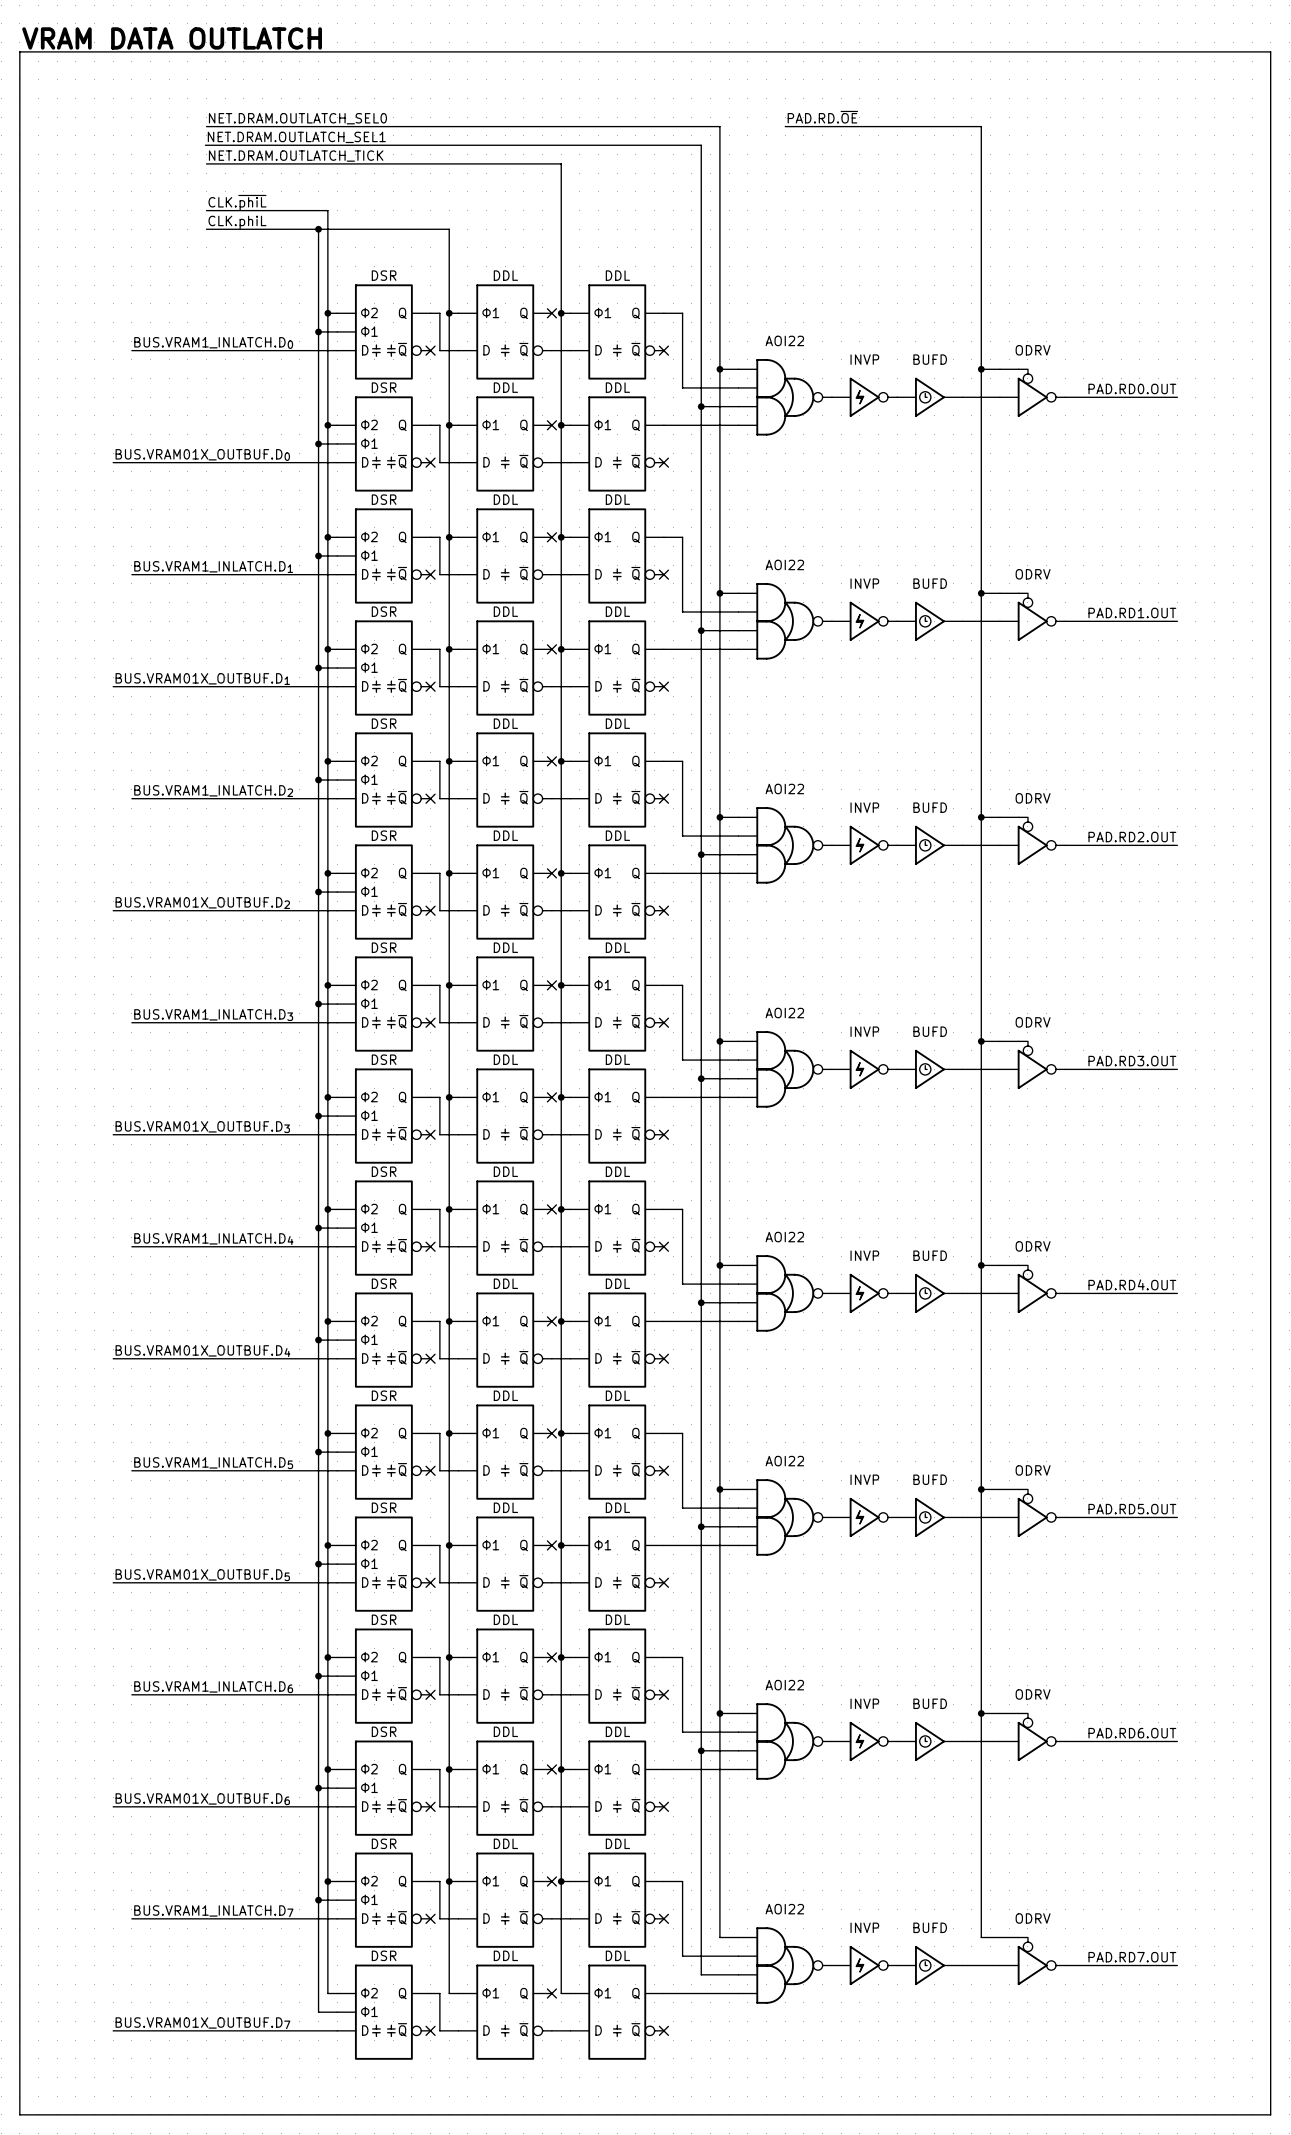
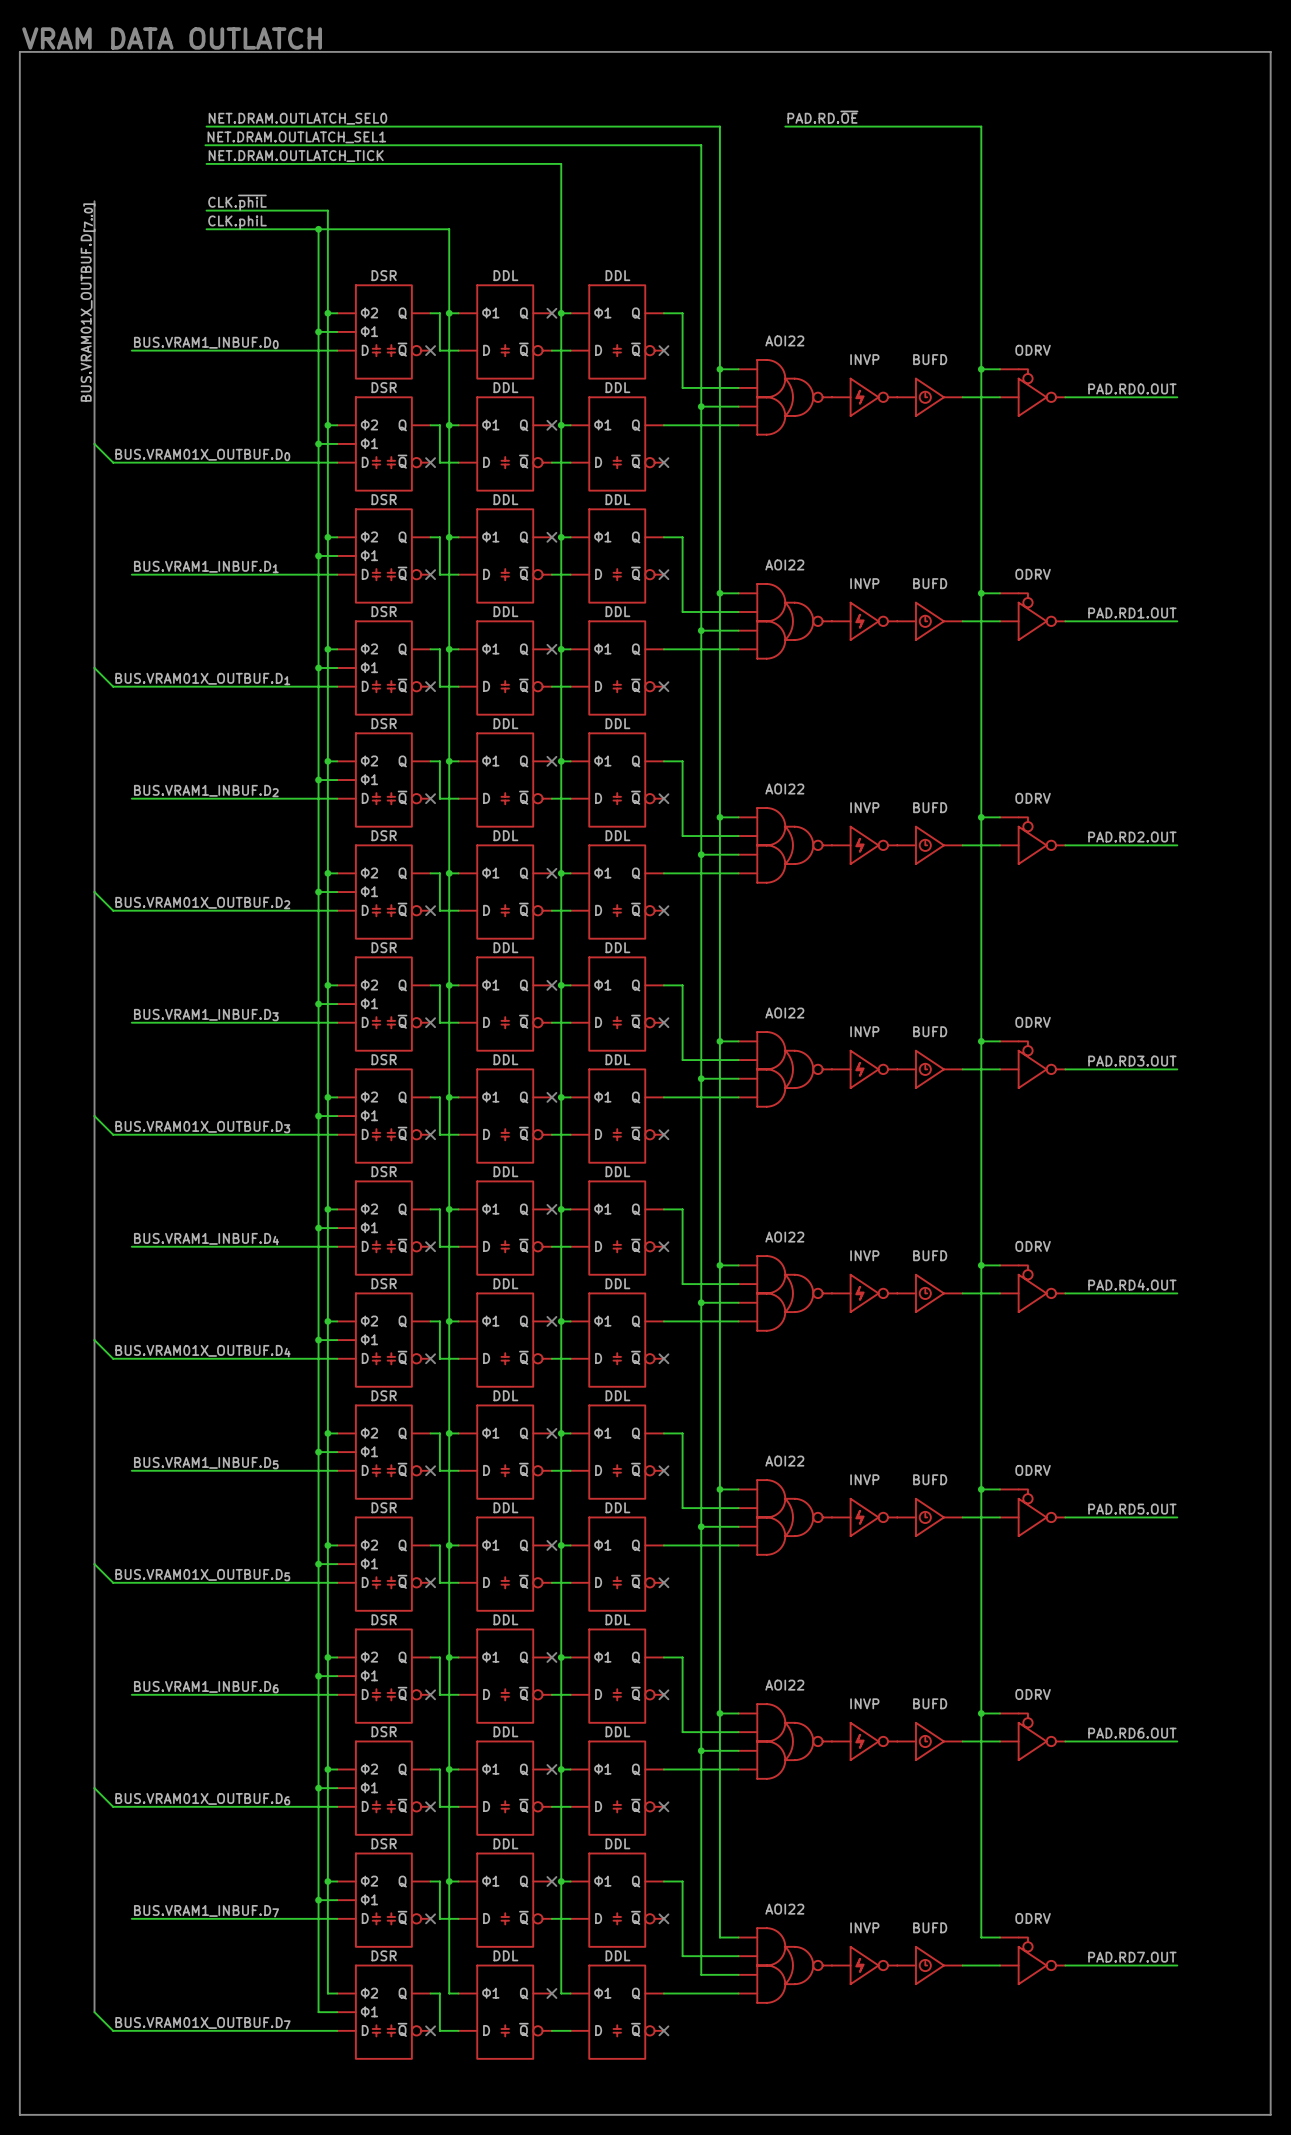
bus: none -> (94, 201) (94, 2012)
label: none -> BUS.VRAM01X_OUTBUF.D[7..0] (88, 302)
label: BUS.VRAM1_INLATCH.D0 (213, 342) -> BUS.VRAM1_INBUF.D0 (206, 342)
wire: none -> (94, 443) (113, 462)
label: BUS.VRAM1_INLATCH.D1 (213, 567) -> BUS.VRAM1_INBUF.D1 (206, 567)
wire: none -> (94, 668) (113, 686)
label: BUS.VRAM1_INLATCH.D2 (213, 791) -> BUS.VRAM1_INBUF.D2 (206, 791)
wire: none -> (94, 892) (113, 910)
label: BUS.VRAM1_INLATCH.D3 (213, 1015) -> BUS.VRAM1_INBUF.D3 (206, 1015)
wire: none -> (94, 1116) (113, 1134)
label: BUS.VRAM1_INLATCH.D4 (213, 1239) -> BUS.VRAM1_INBUF.D4 (206, 1239)
wire: none -> (94, 1340) (113, 1358)
label: BUS.VRAM1_INLATCH.D5 (213, 1463) -> BUS.VRAM1_INBUF.D5 (206, 1463)
wire: none -> (94, 1564) (113, 1582)
label: BUS.VRAM1_INLATCH.D6 (213, 1687) -> BUS.VRAM1_INBUF.D6 (206, 1687)
wire: none -> (94, 1788) (113, 1806)
label: BUS.VRAM1_INLATCH.D7 (213, 1911) -> BUS.VRAM1_INBUF.D7 (206, 1911)
wire: none -> (94, 2012) (113, 2030)

